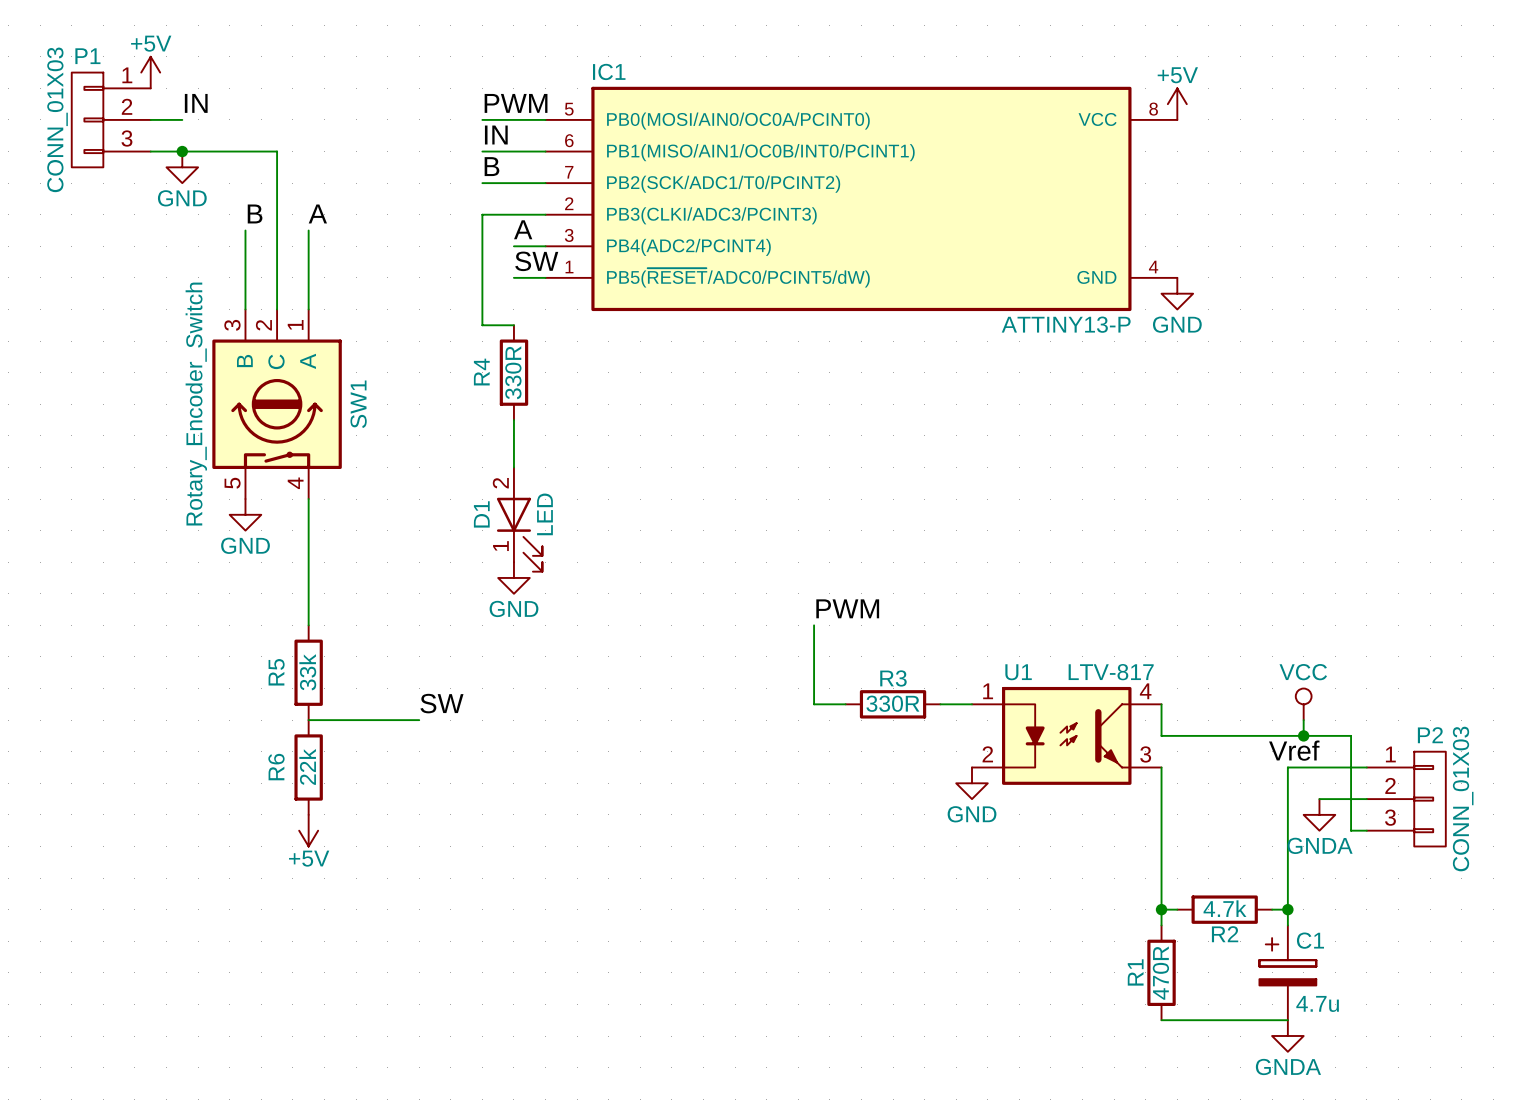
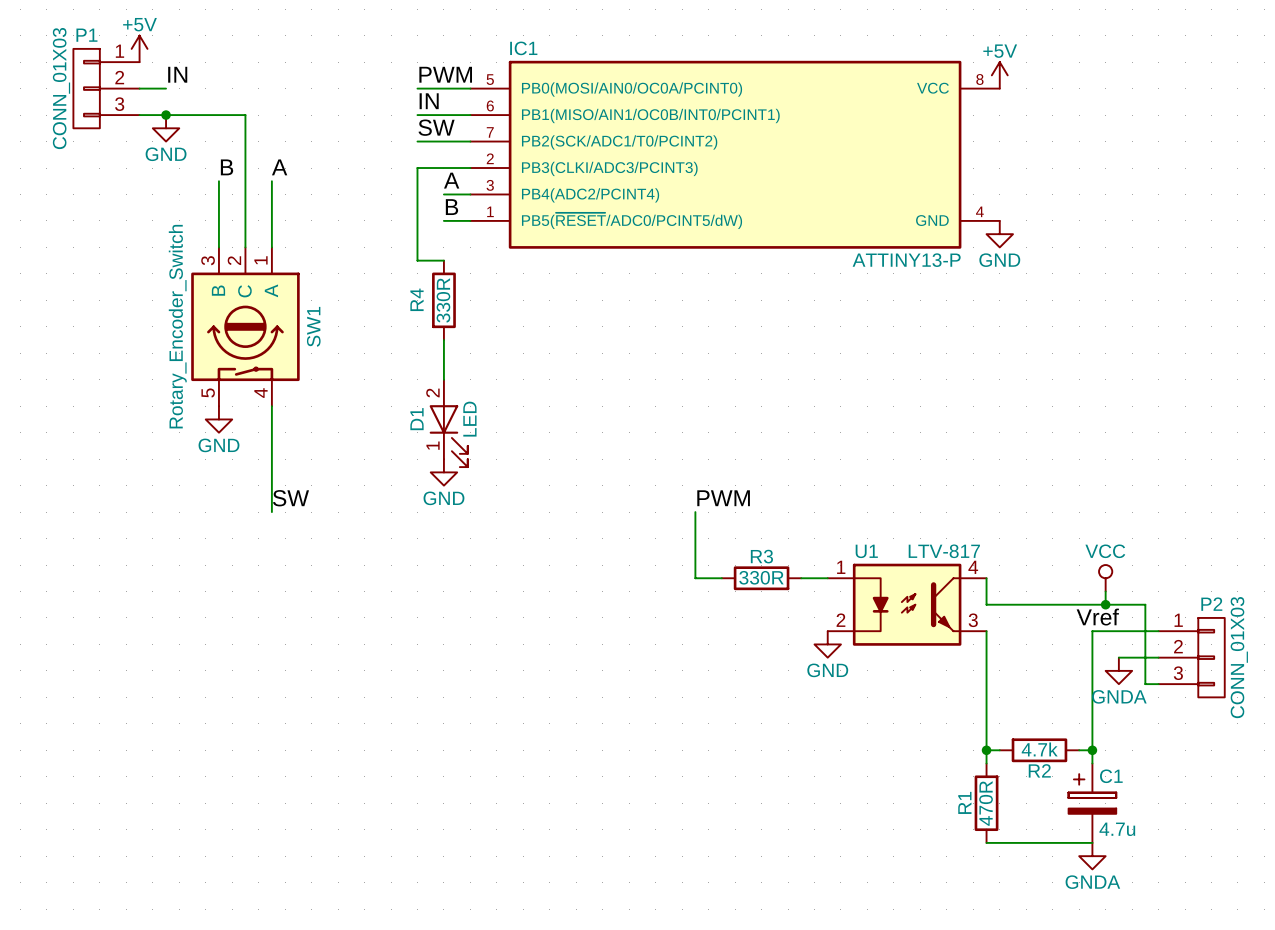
label: B (491, 166) -> SW (436, 127)
label: SW (536, 261) -> B (451, 207)
R5: 33k (308, 672) -> none
label position: SW (441, 703) -> SW (290, 498)
wire: (308, 720) (419, 720) -> none
R6: 22k (308, 767) -> none
power symbol: +5V (308, 830) -> none

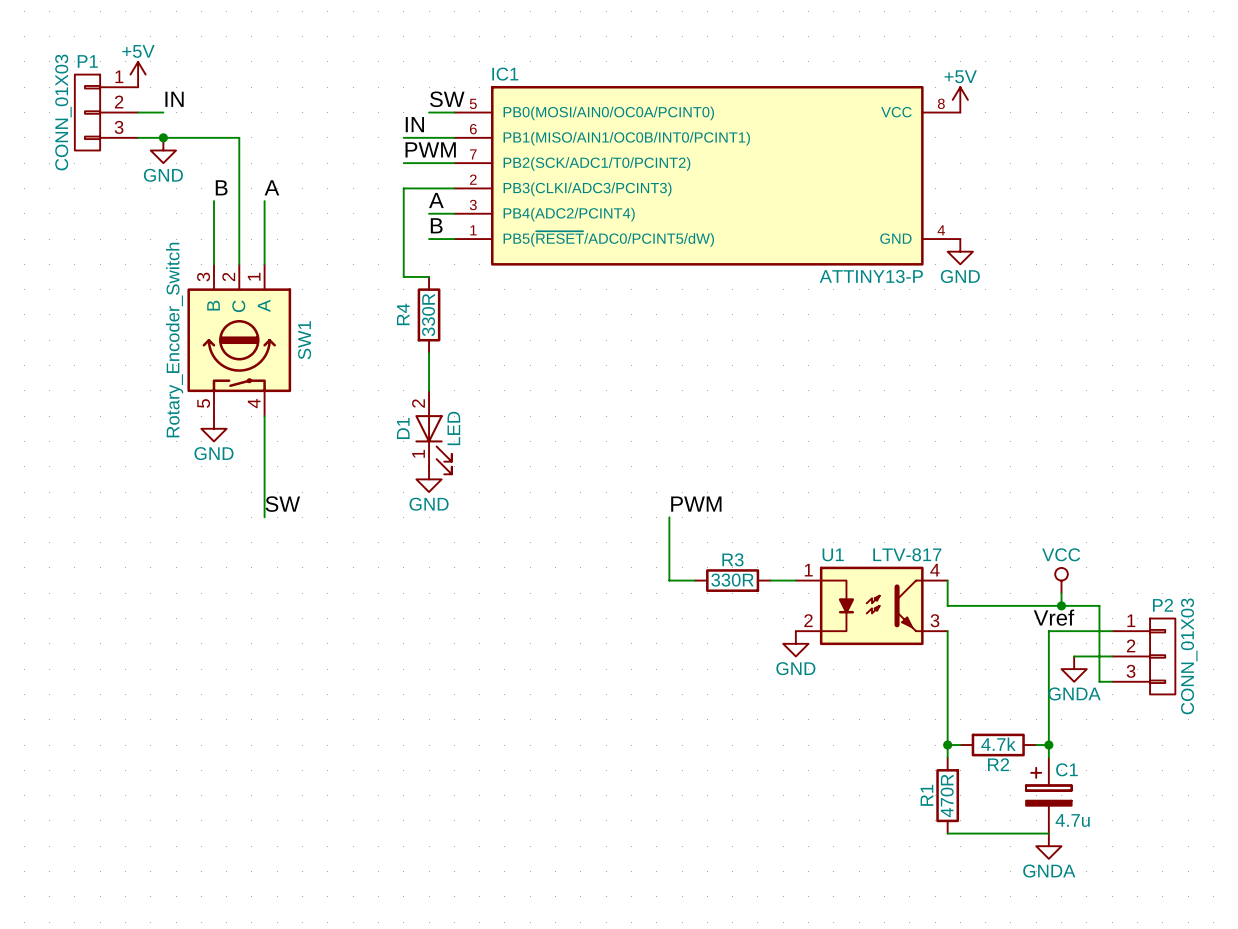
label: PWM (445, 74) -> none
label: none -> SW (447, 99)
wire: (417, 88) (443, 88) -> none
label: SW (436, 127) -> PWM (430, 149)

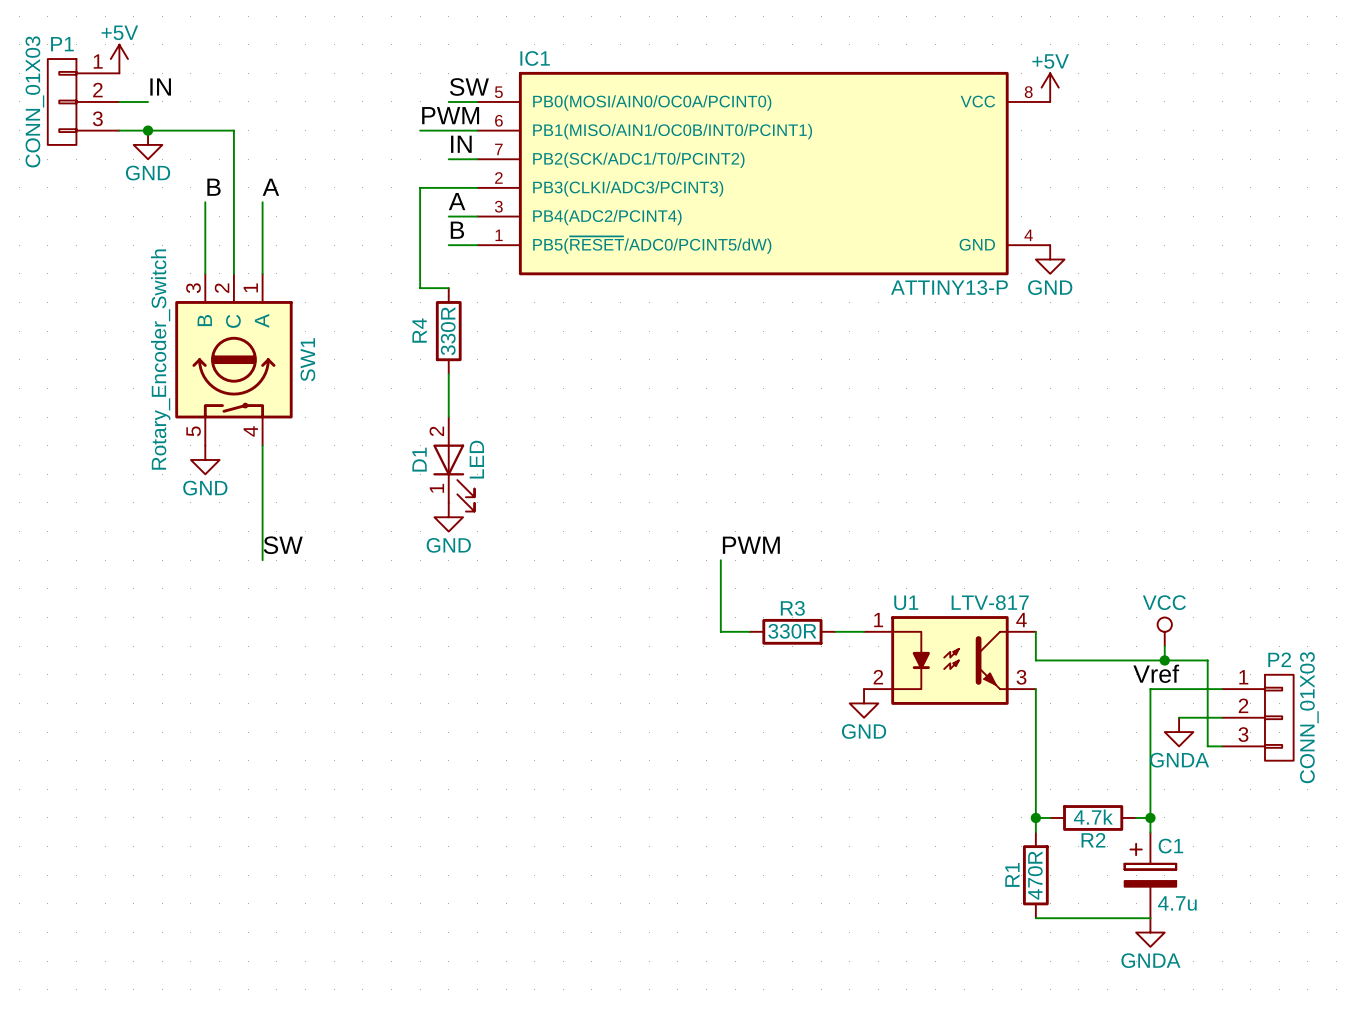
label: IN (414, 124) -> PWM (450, 115)
label: PWM (430, 149) -> none
label: none -> IN (461, 144)
wire: (403, 163) (429, 163) -> none

